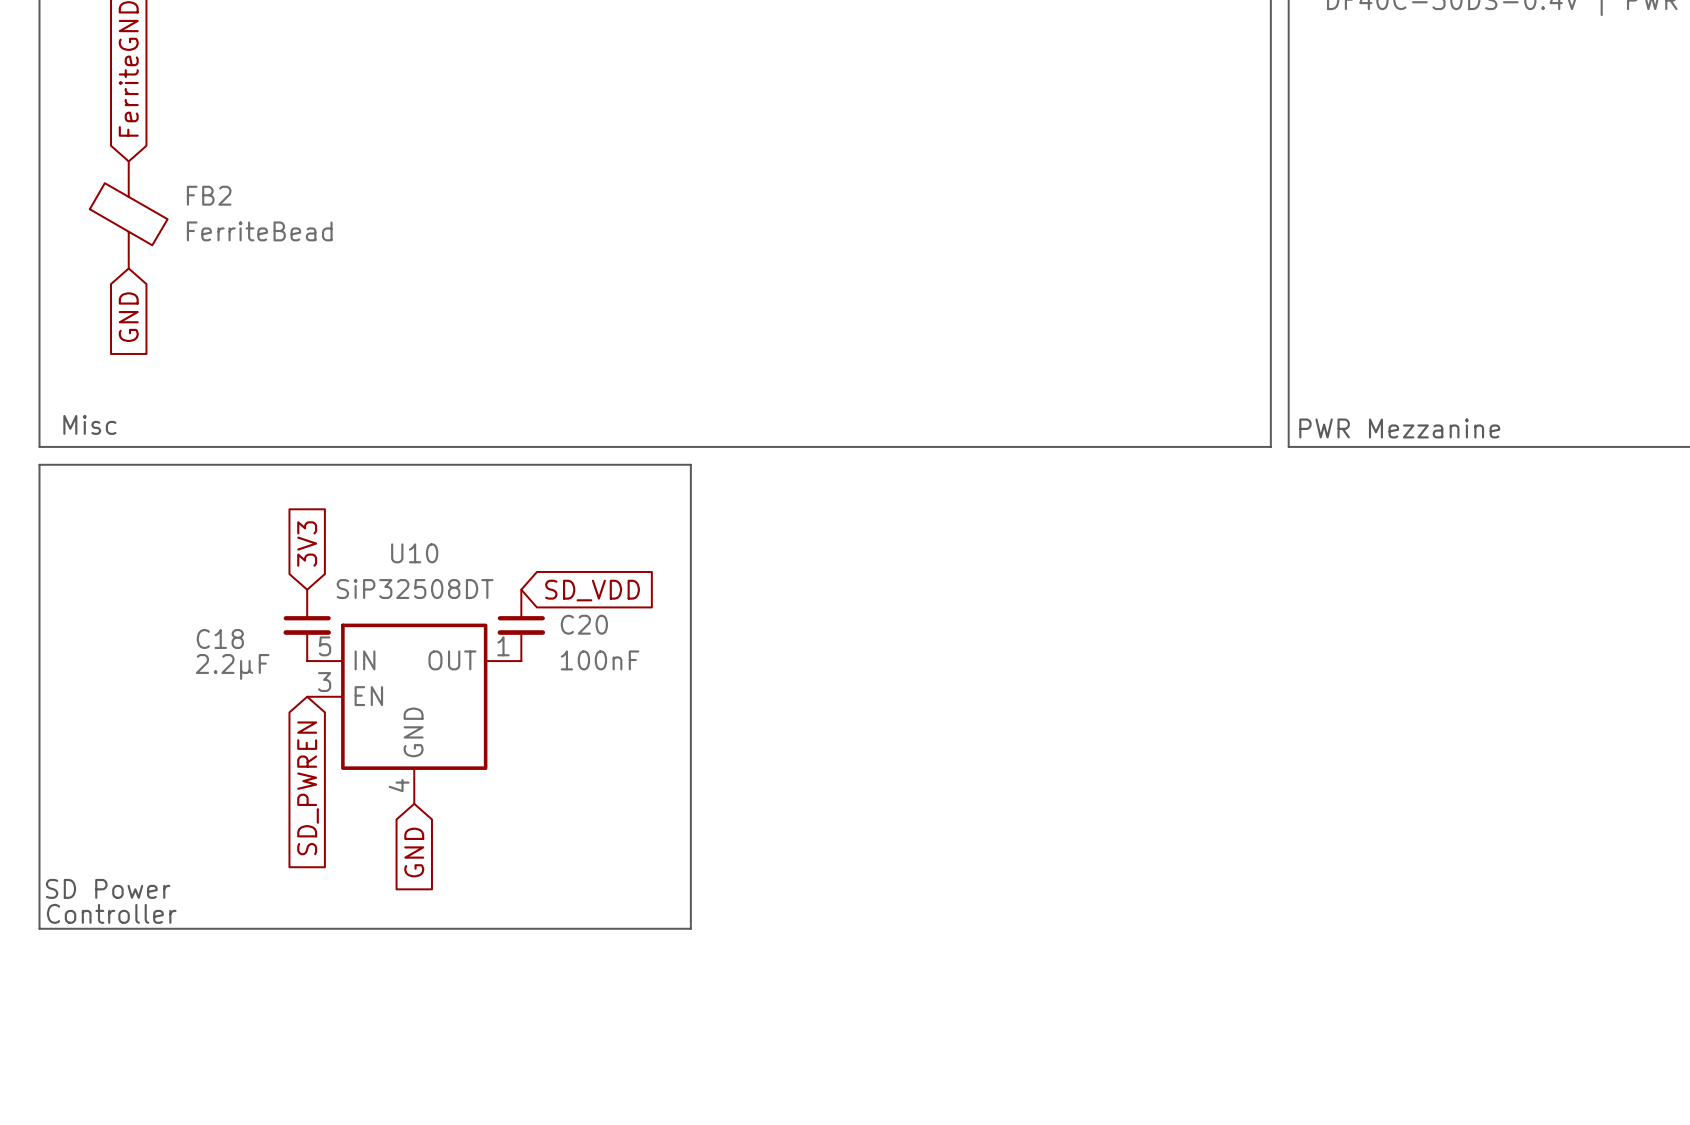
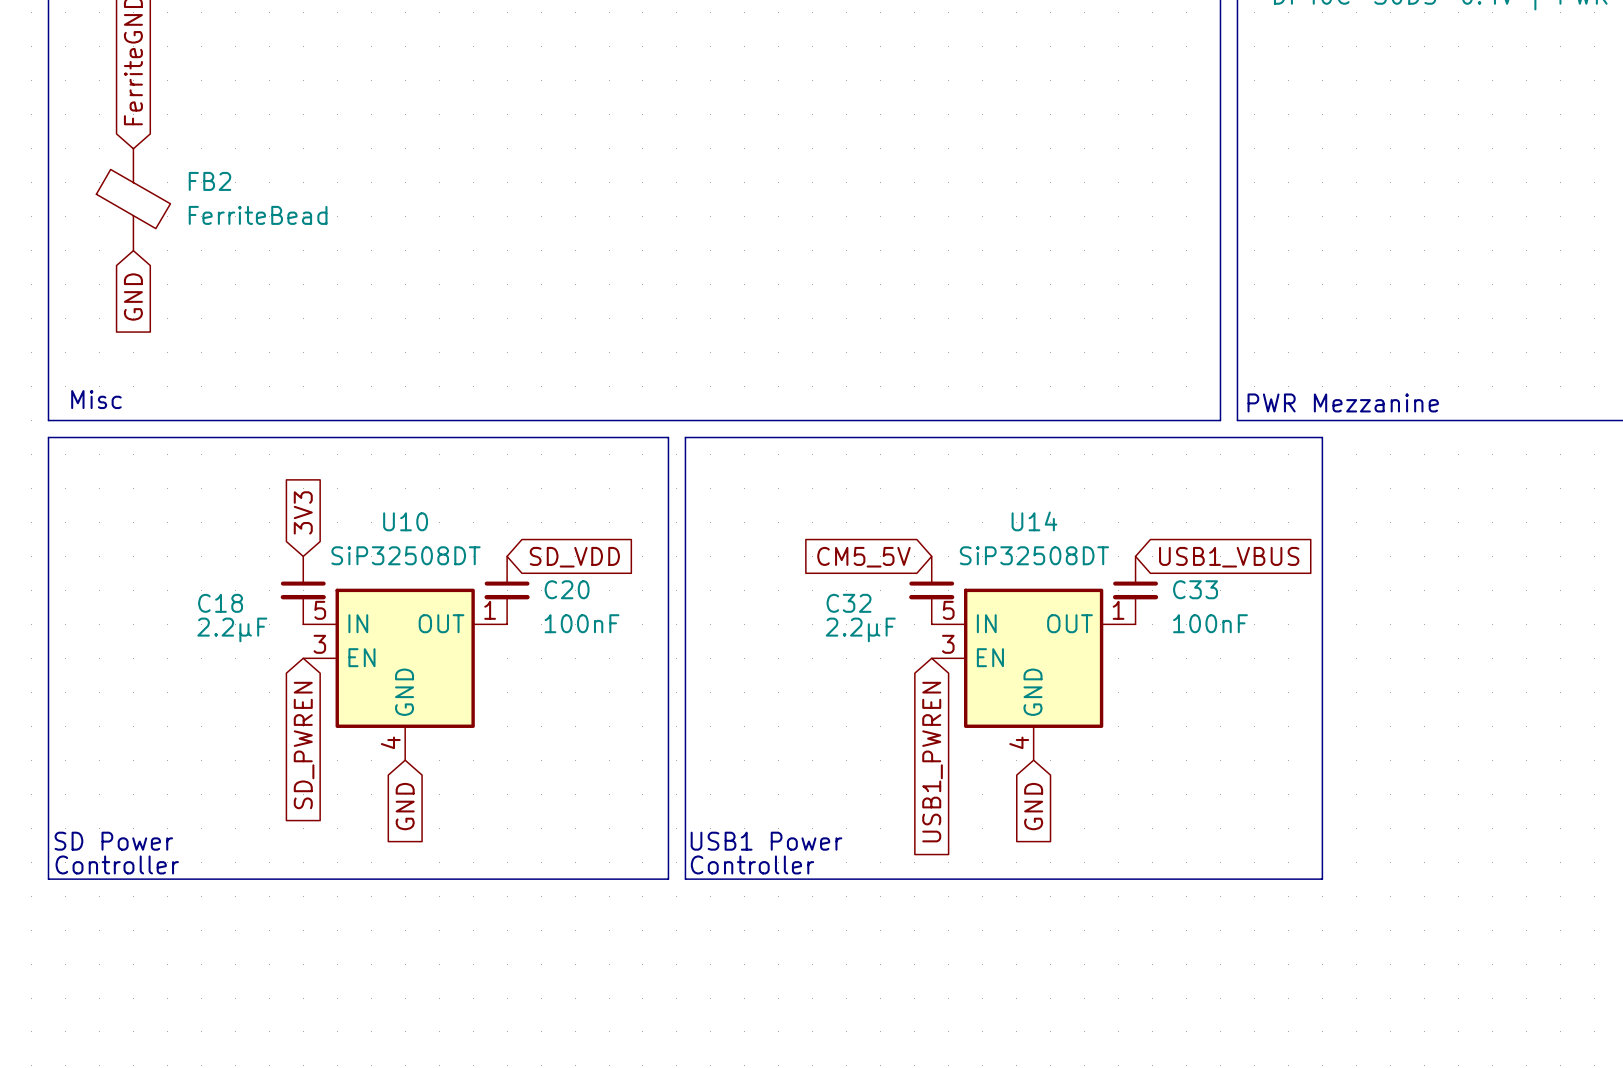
line: none -> (685, 437) (1322, 437) (1322, 879) (685, 879) (685, 437)
global label: none -> CM5_5V (863, 557)
global label: none -> USB1_VBUS (1229, 557)
C32: none -> 2.2µF (931, 590)
C33: none -> 100nF (1135, 590)
U14: none -> SiP32508DT (1033, 674)
global label: none -> USB1_PWREN (932, 762)
global label: none -> GND (1033, 806)
text: none -> USB1 Power (766, 841)
text: none -> Controller (752, 864)

